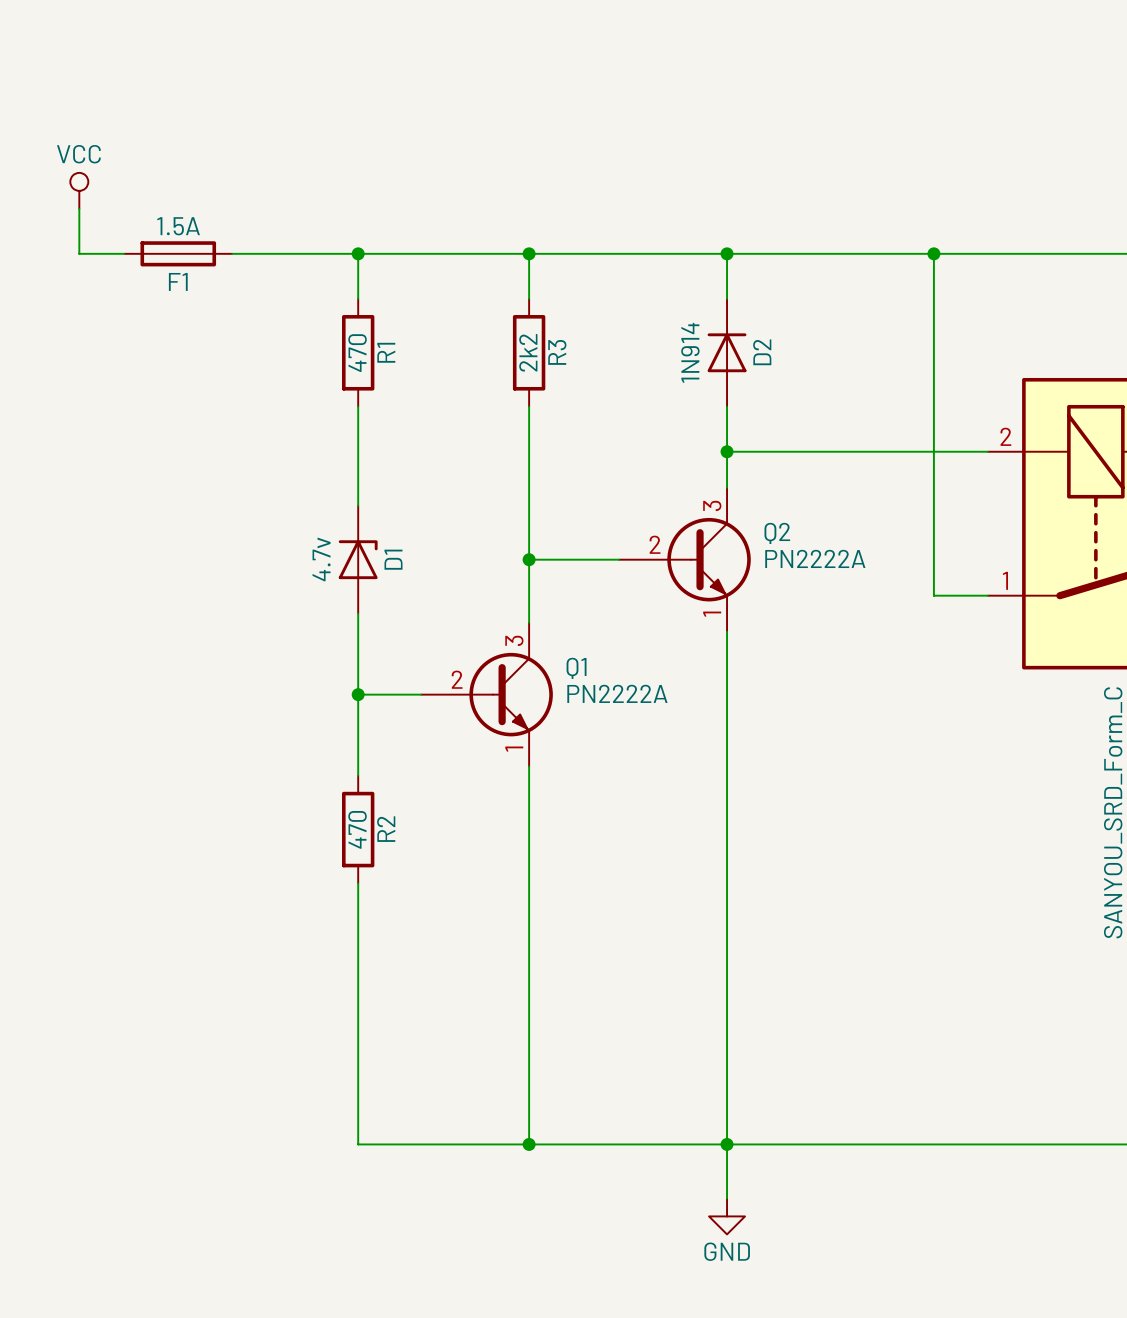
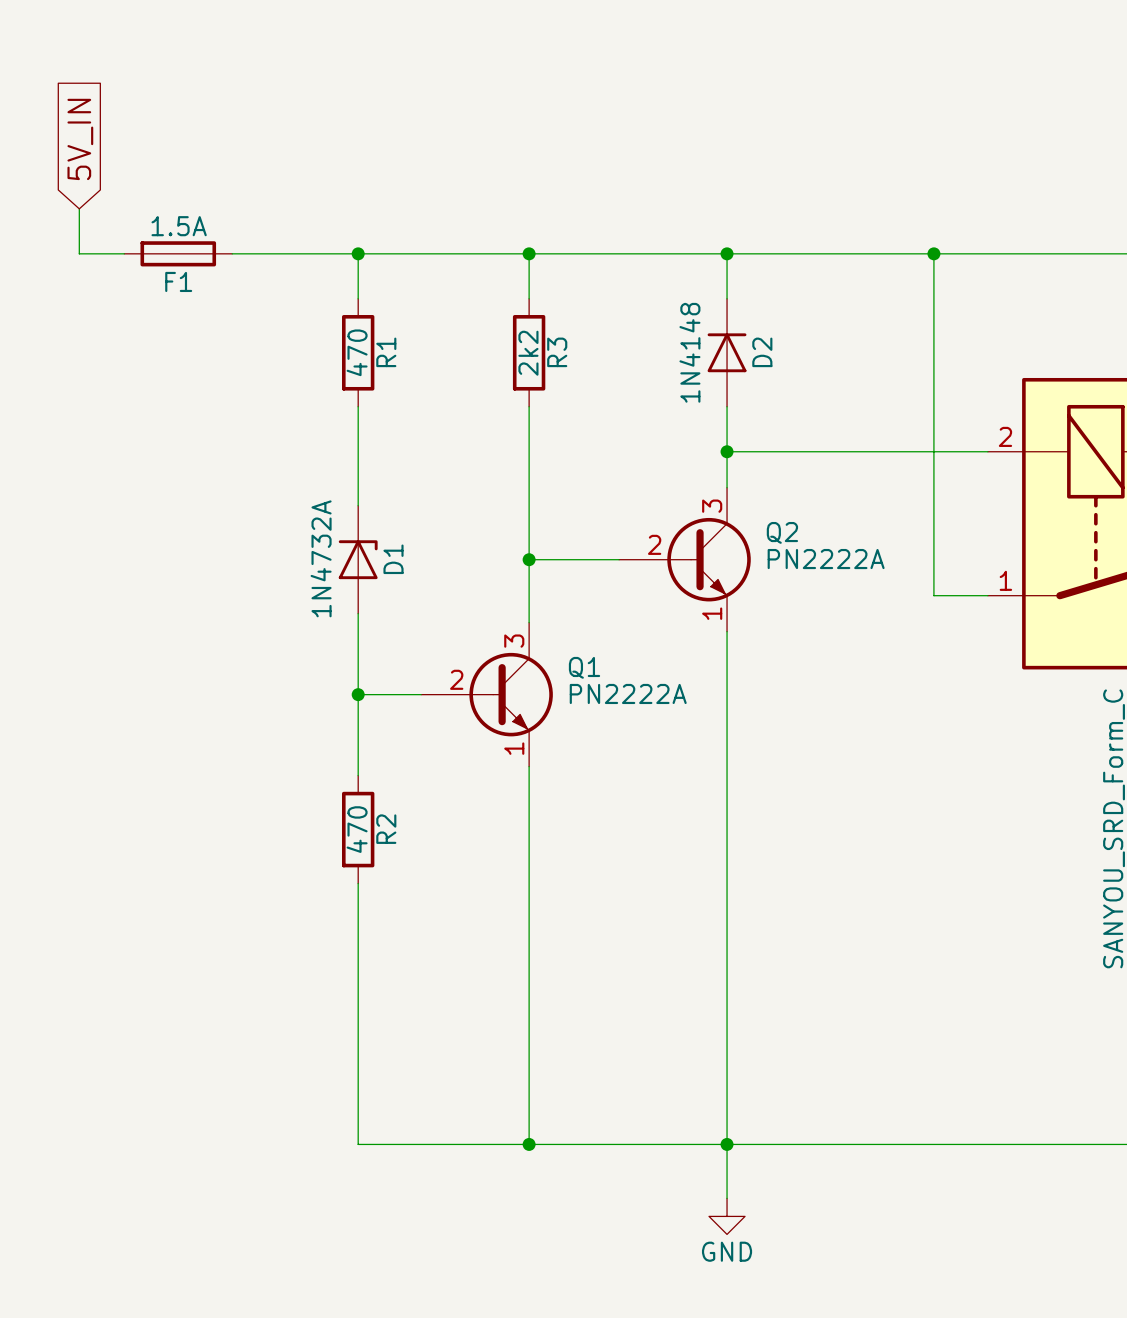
global label: none -> 5V_IN (80, 139)
power symbol: VCC (79, 190) -> none
D2 value: 1N914 (690, 352) -> 1N4148 (689, 352)
D1 value: 4.7v (321, 559) -> 1N4732A (321, 558)

